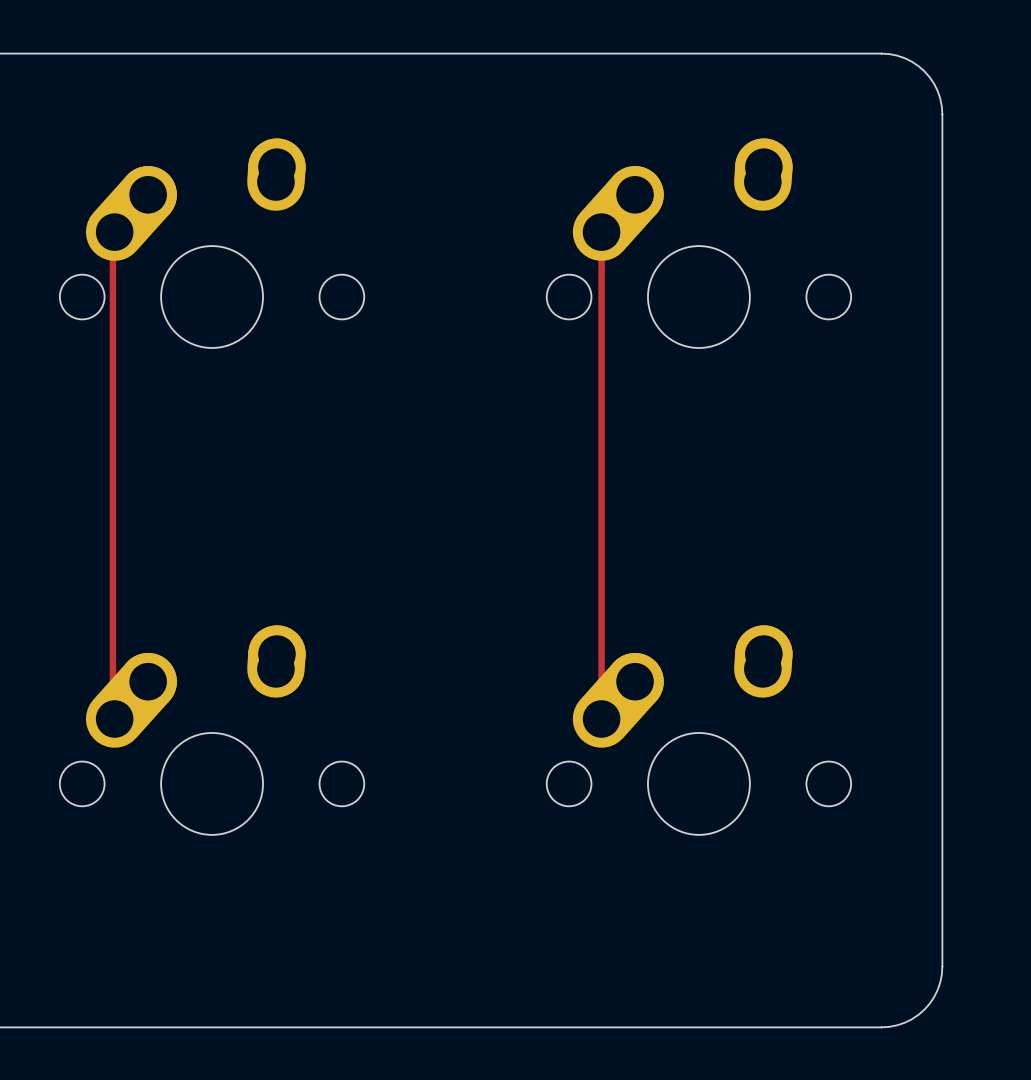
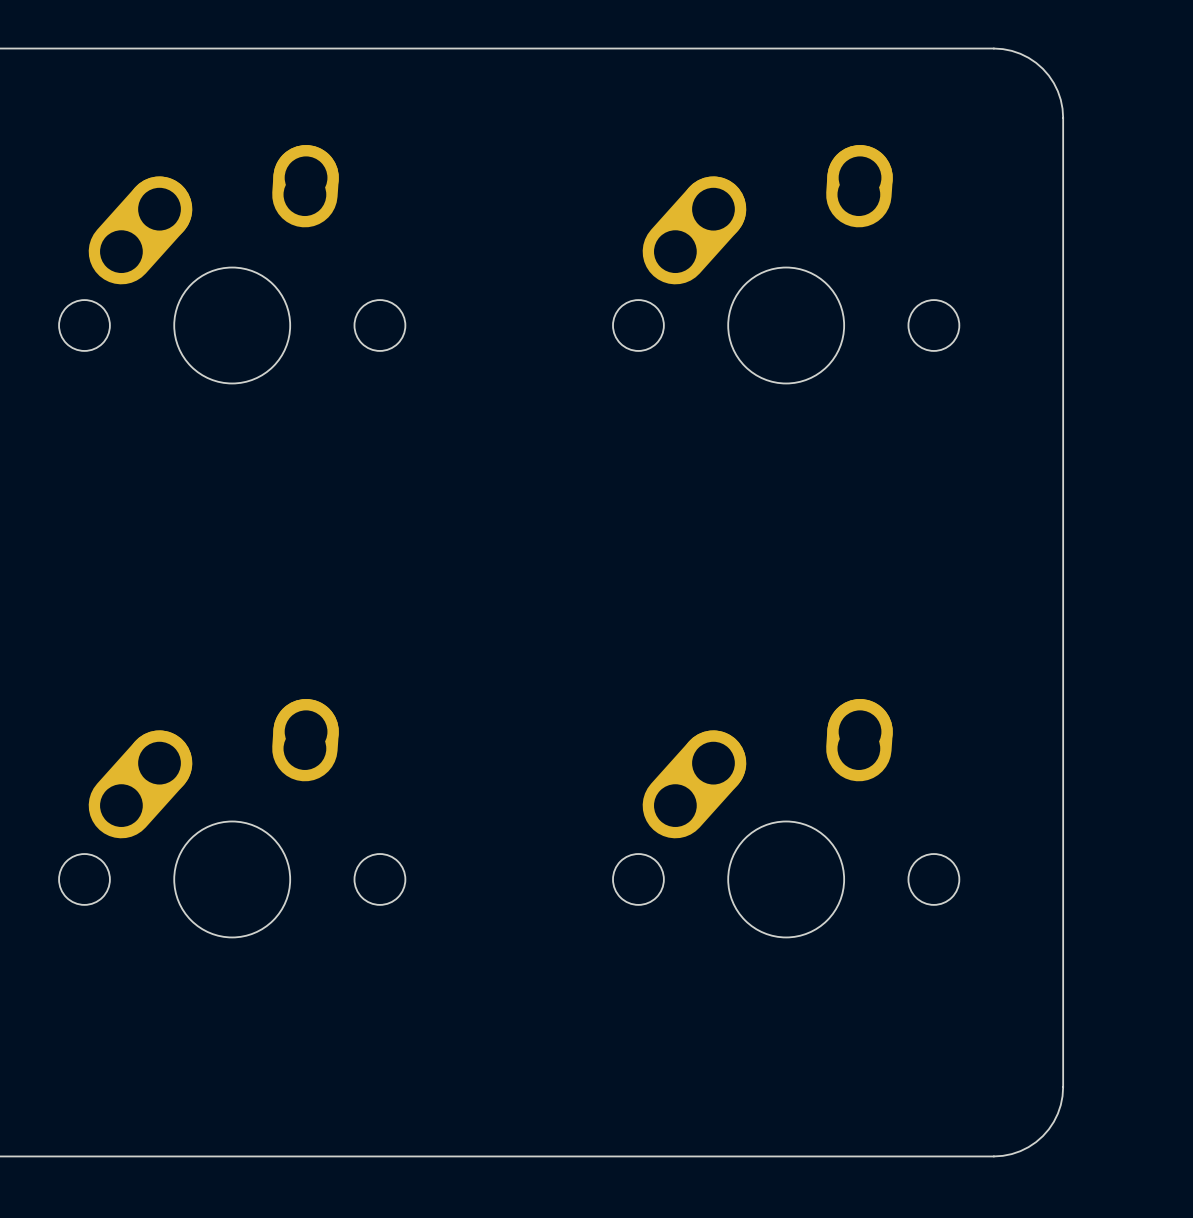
track: (114, 232) (112, 233) (112, 717) (114, 719) -> none
track: (601, 232) (601, 719) -> none

